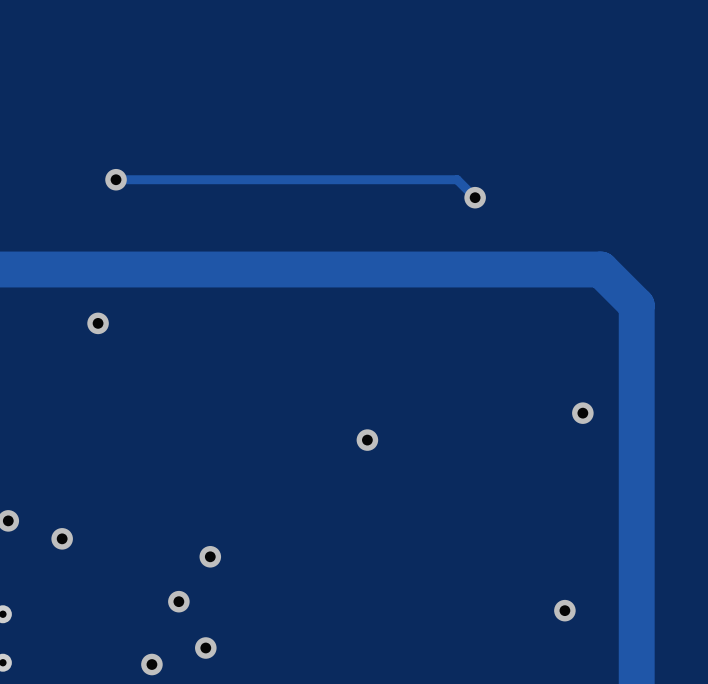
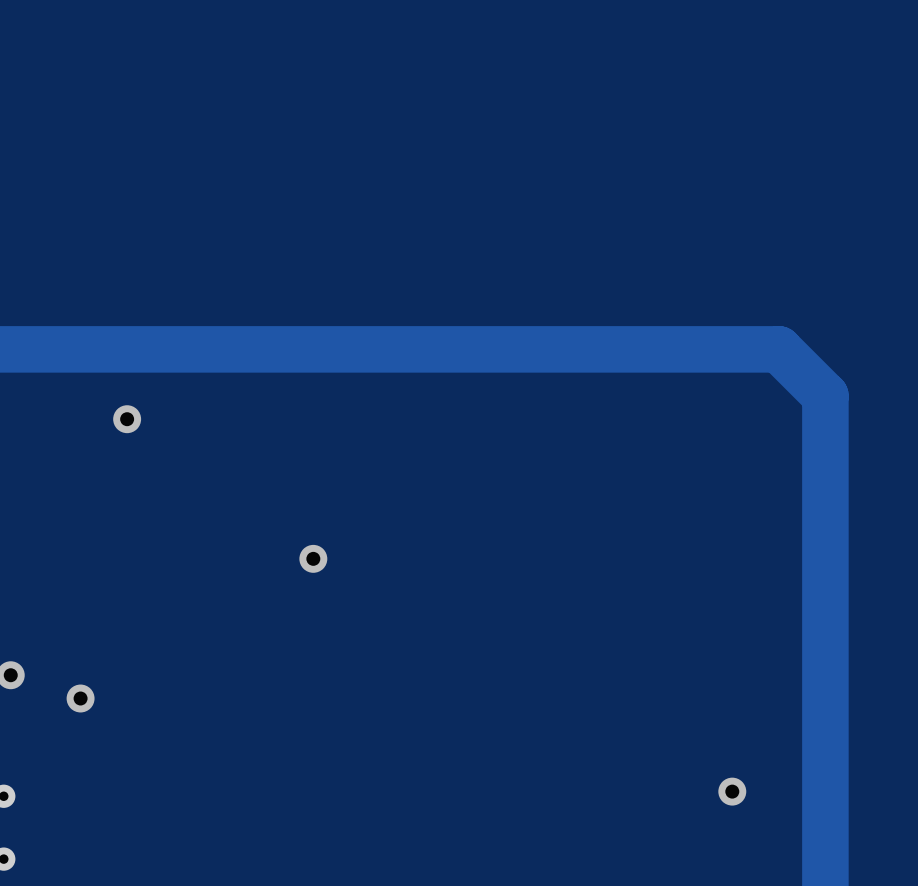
track: (116, 179) (457, 179) (475, 197) -> none
via: (116, 179) -> none
via: (475, 197) -> none
via: (582, 413) -> none
via: none -> (313, 558)
via: (367, 440) -> none
via: (210, 556) -> none
via: (178, 601) -> none
via: (205, 648) -> none
via: (151, 664) -> none

